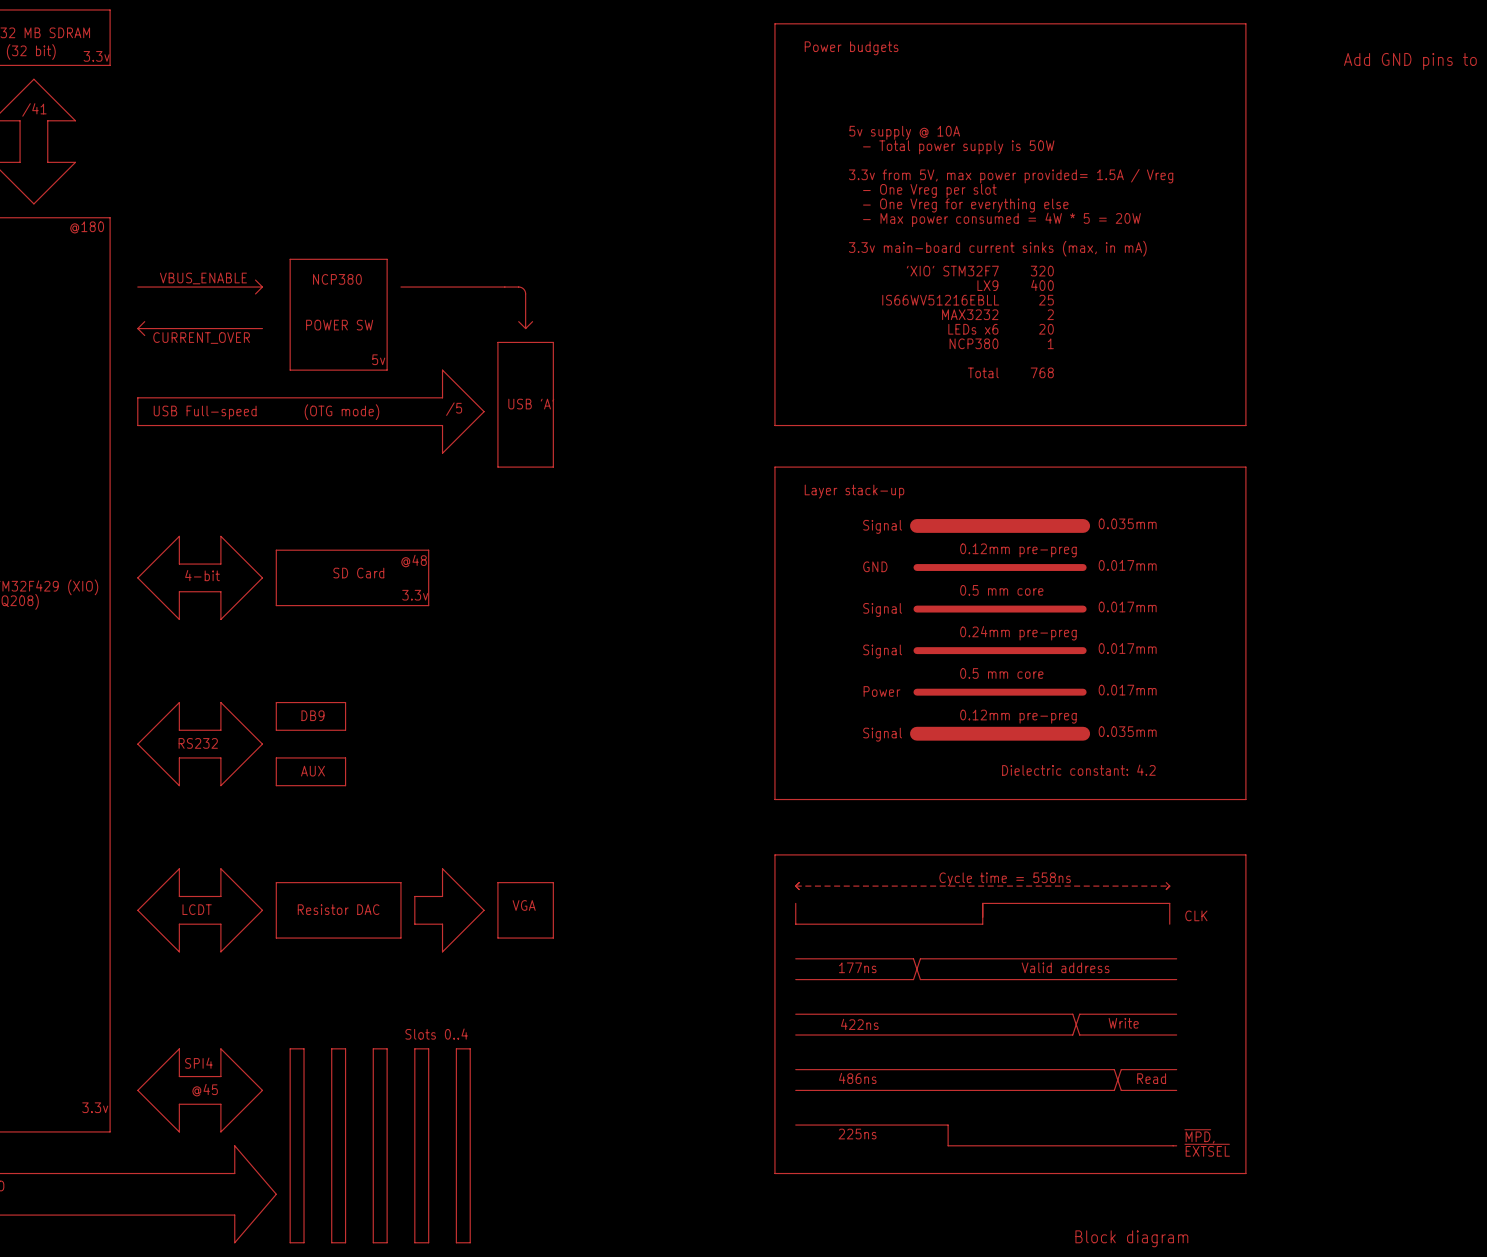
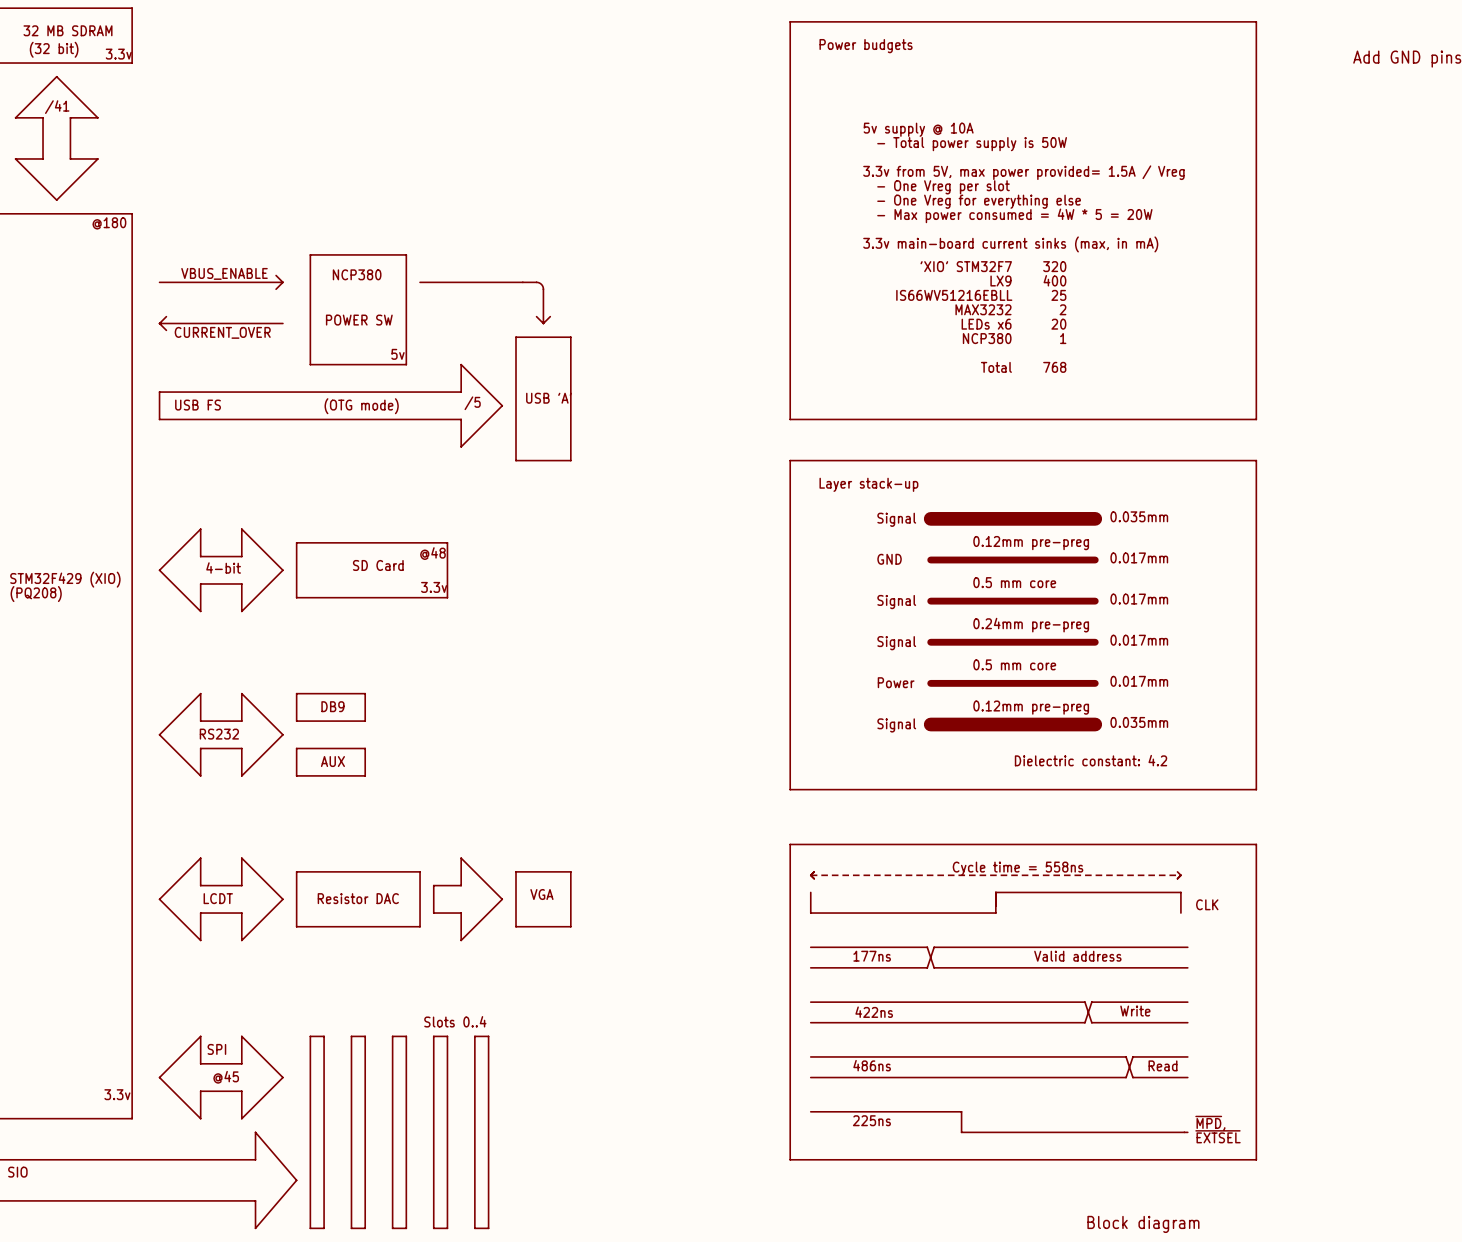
text: USB Full-speed (205, 412) -> USB FS (198, 405)
text: SPI4 (198, 1063) -> SPI (216, 1049)

